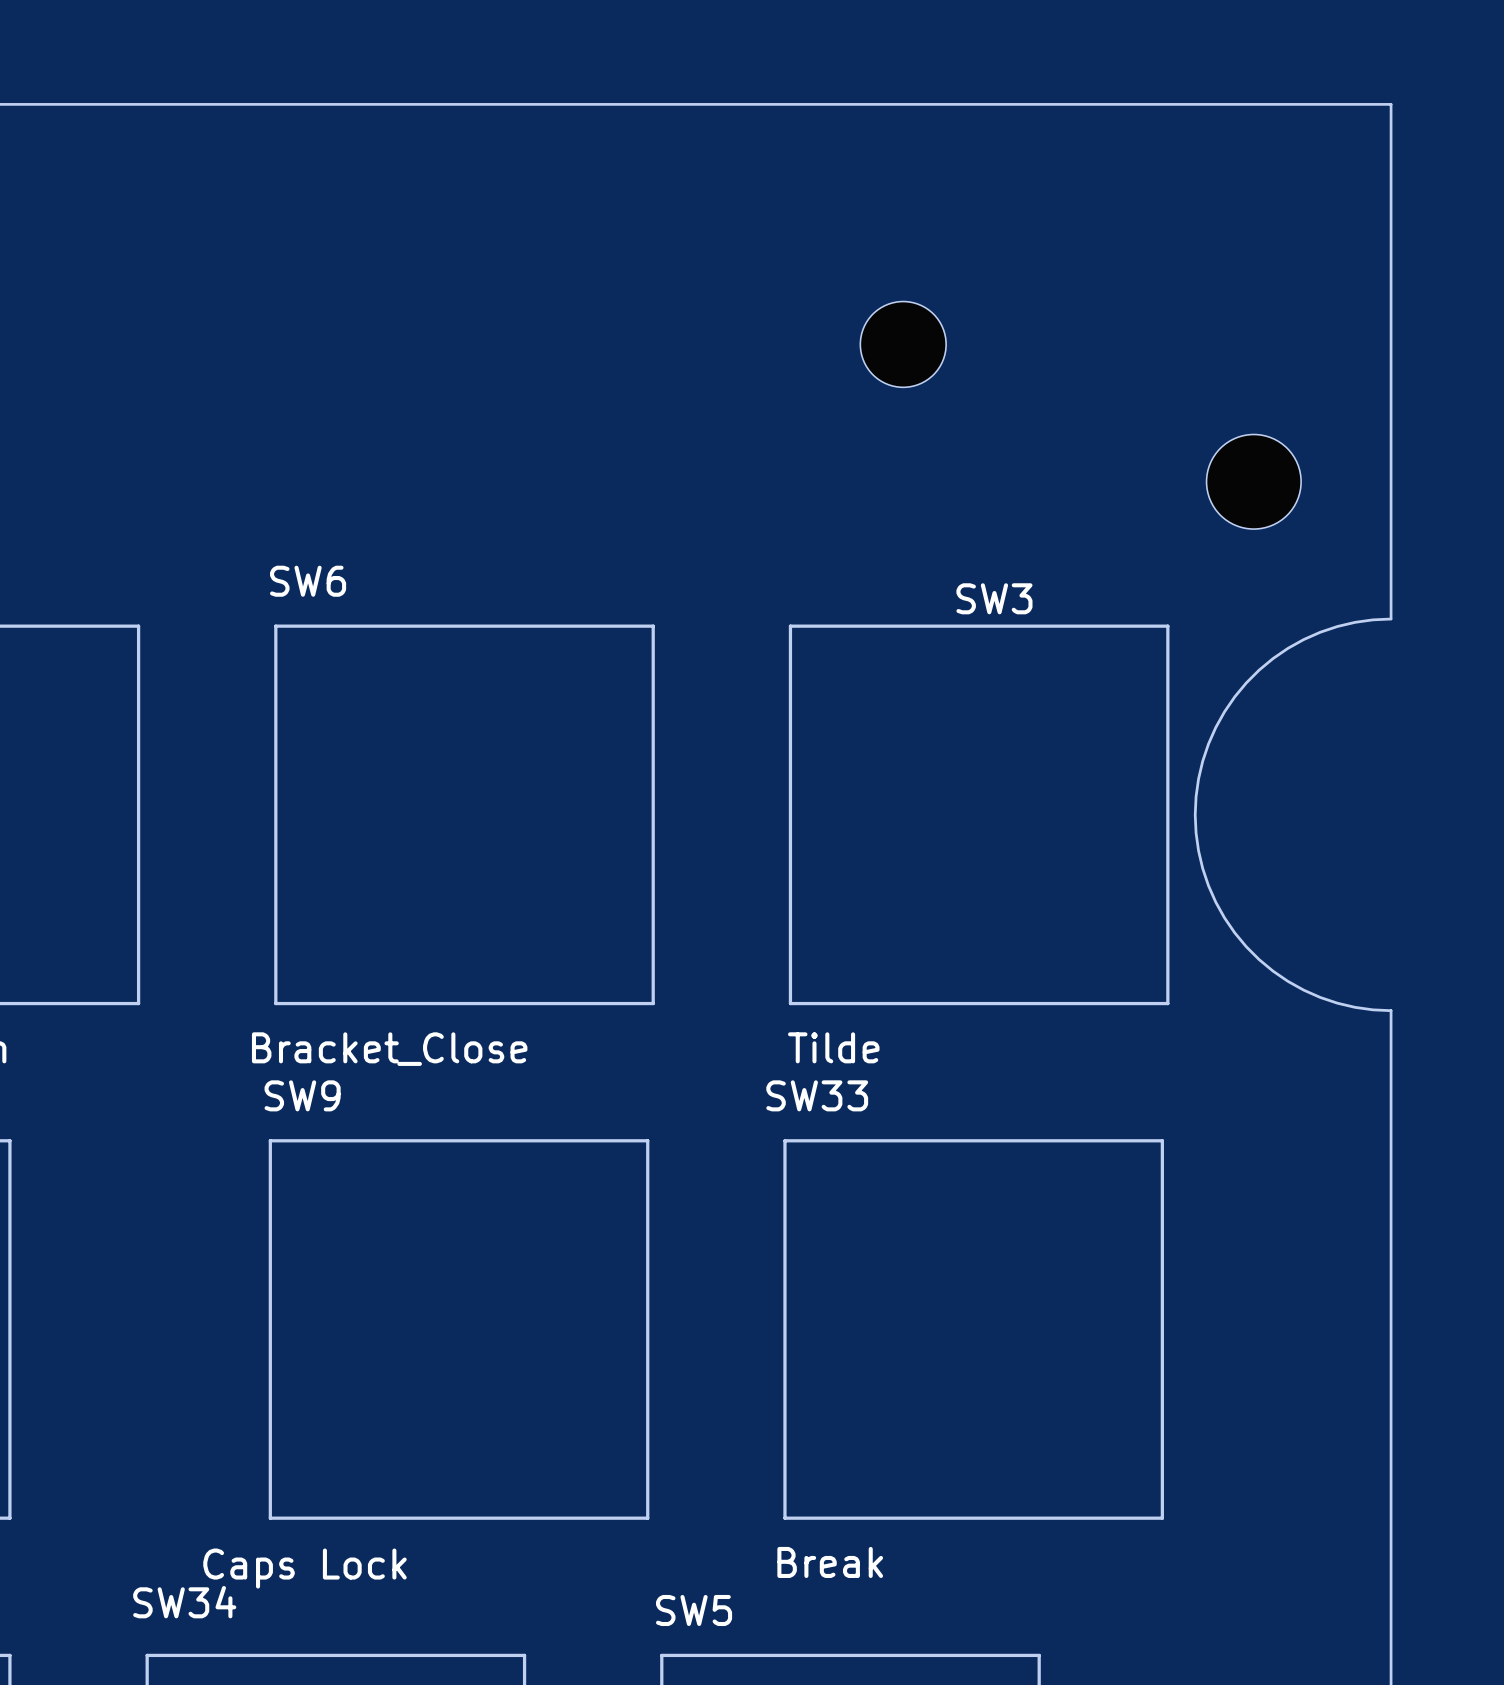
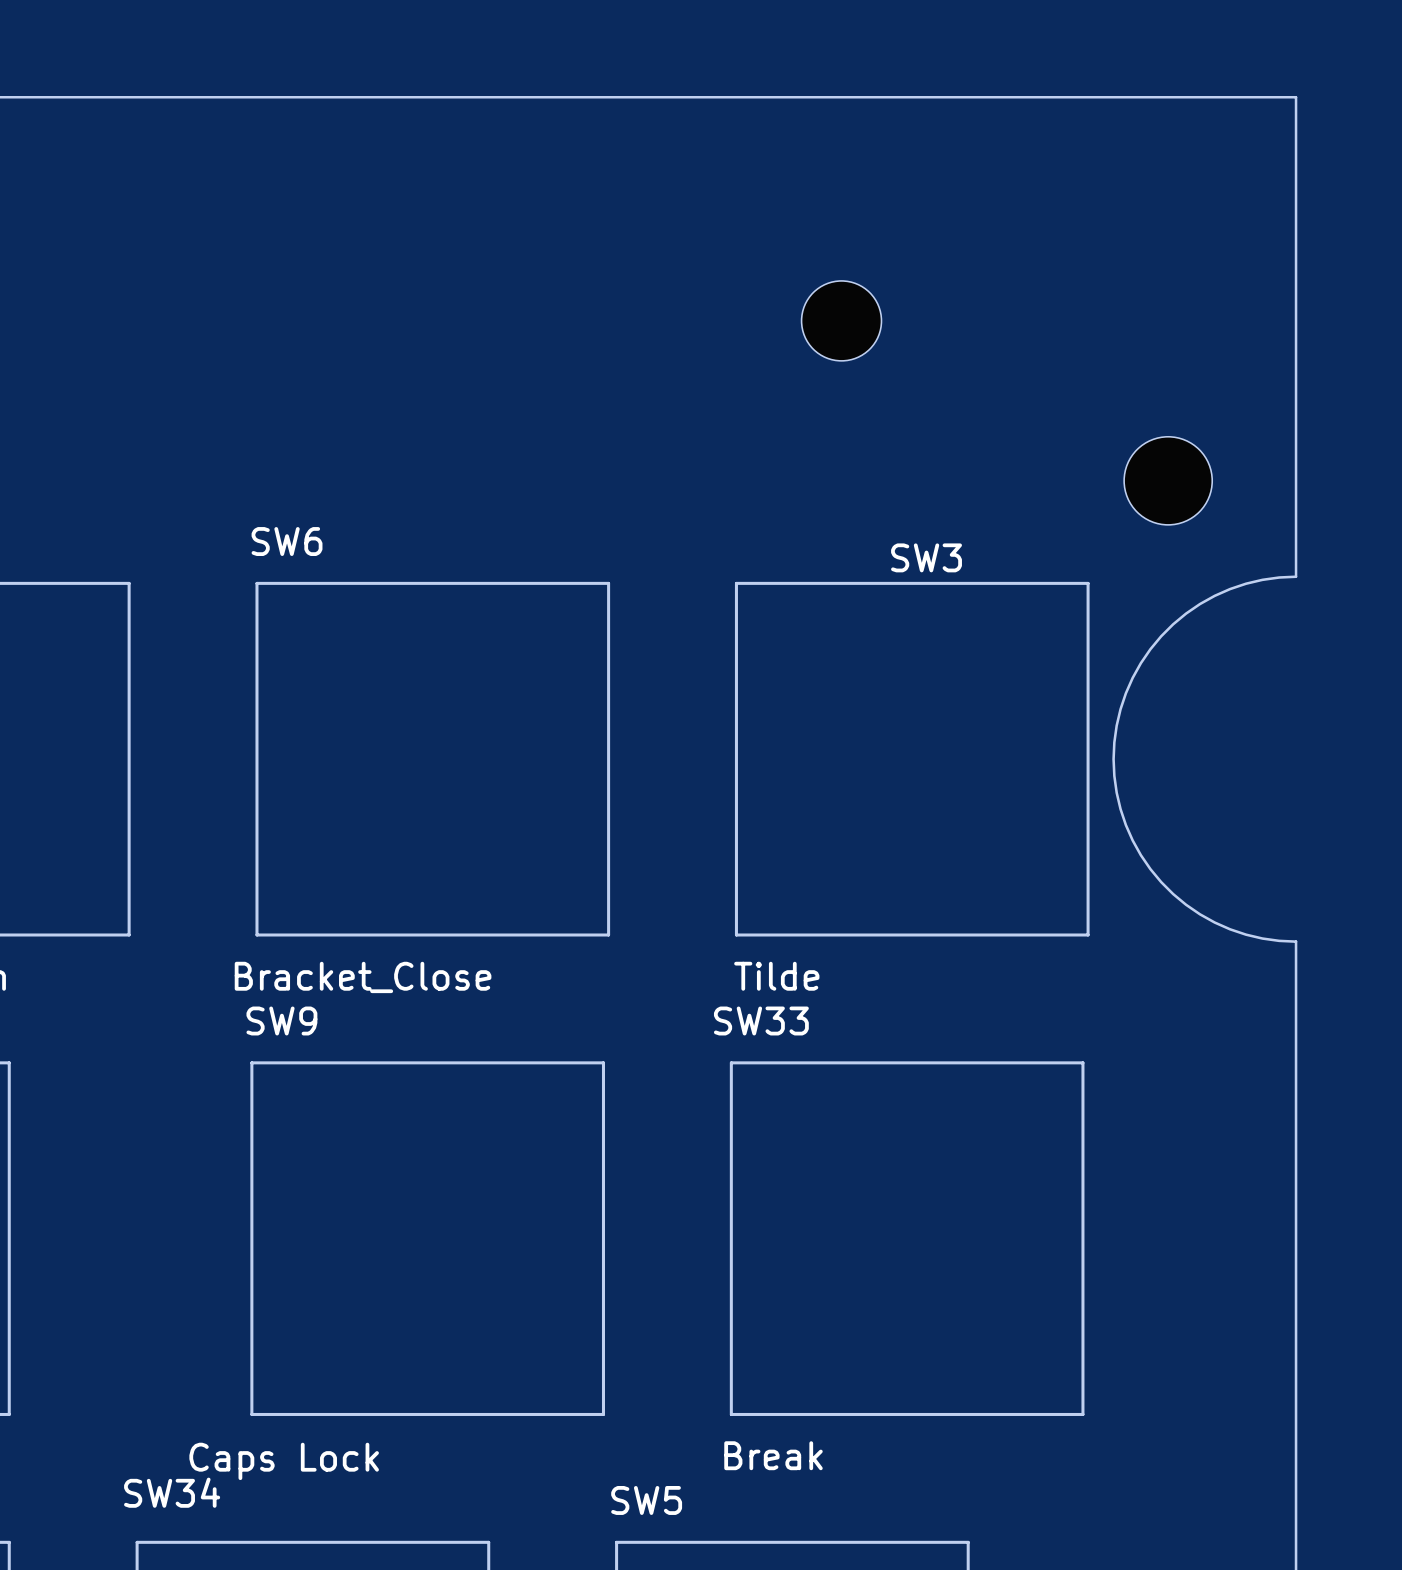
part position: (1253, 481) -> (1168, 480)

